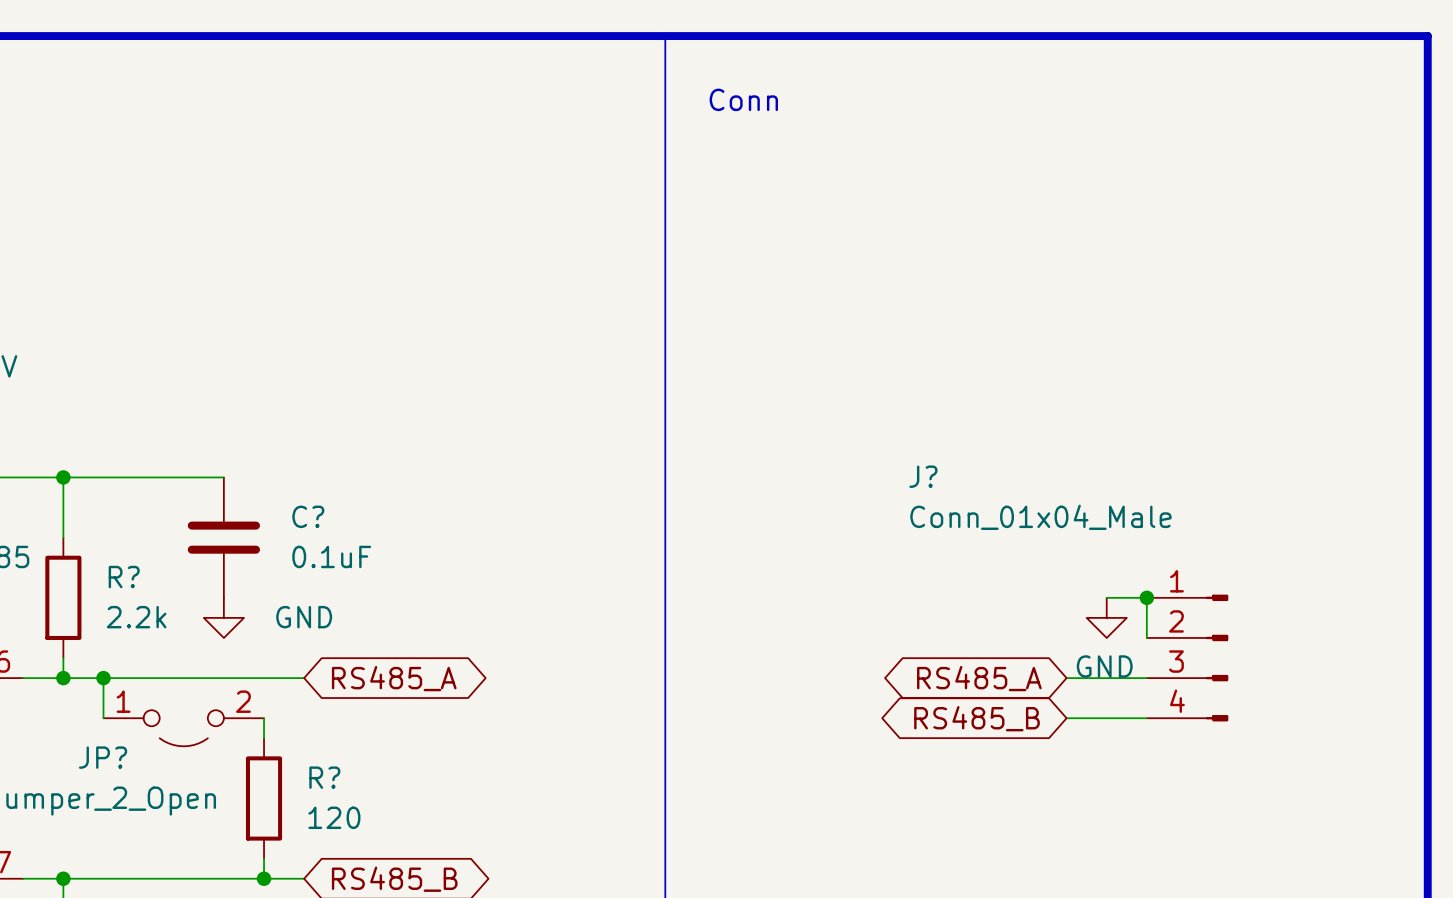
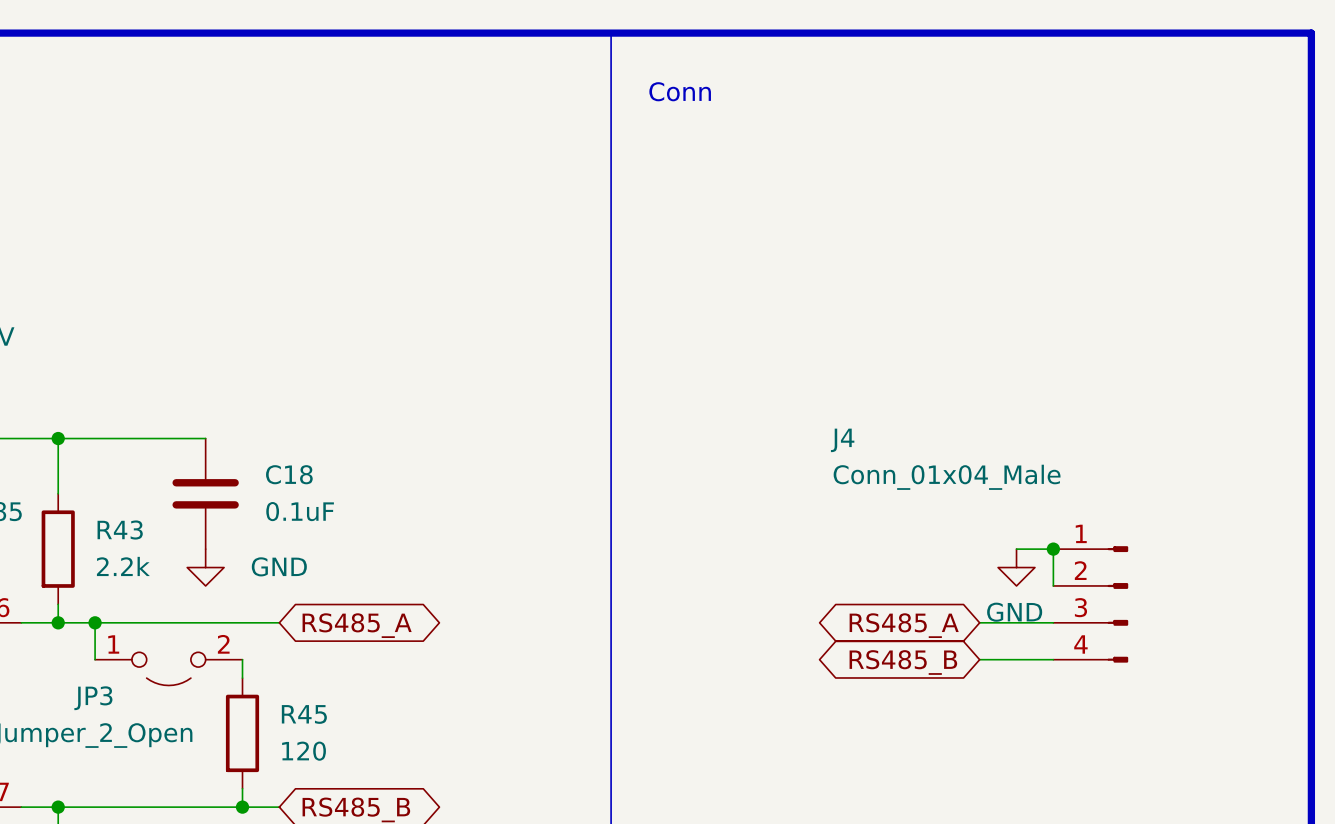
J? name: J? (923, 476) -> J4 (842, 440)
C? name: C? (308, 516) -> C18 (289, 474)
R? name: R? (124, 577) -> R43 (120, 530)
JP? name: JP? (103, 757) -> JP3 (93, 698)
R? name: R? (324, 777) -> R45 (304, 714)

